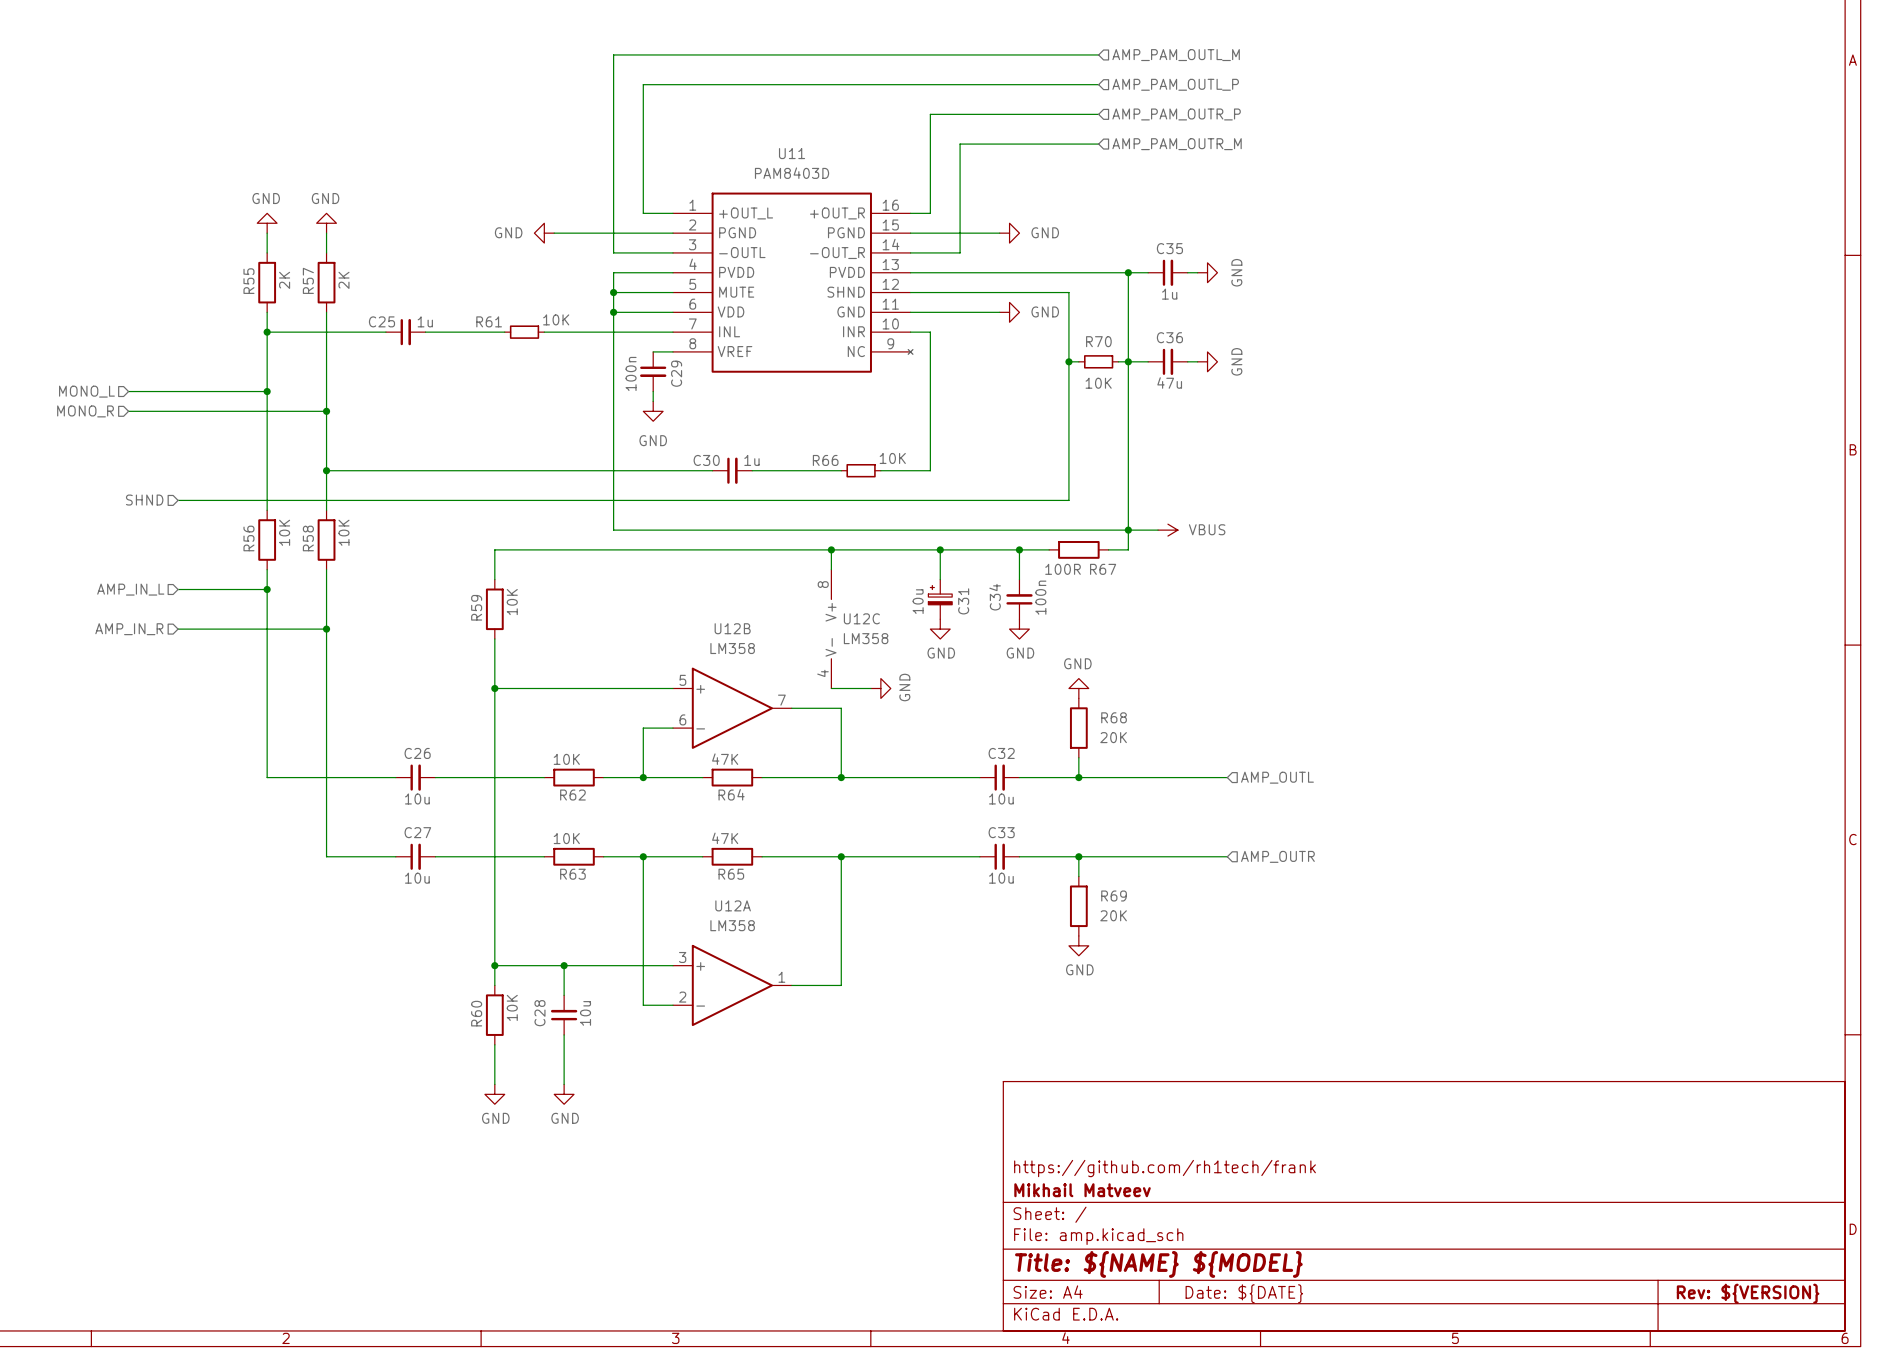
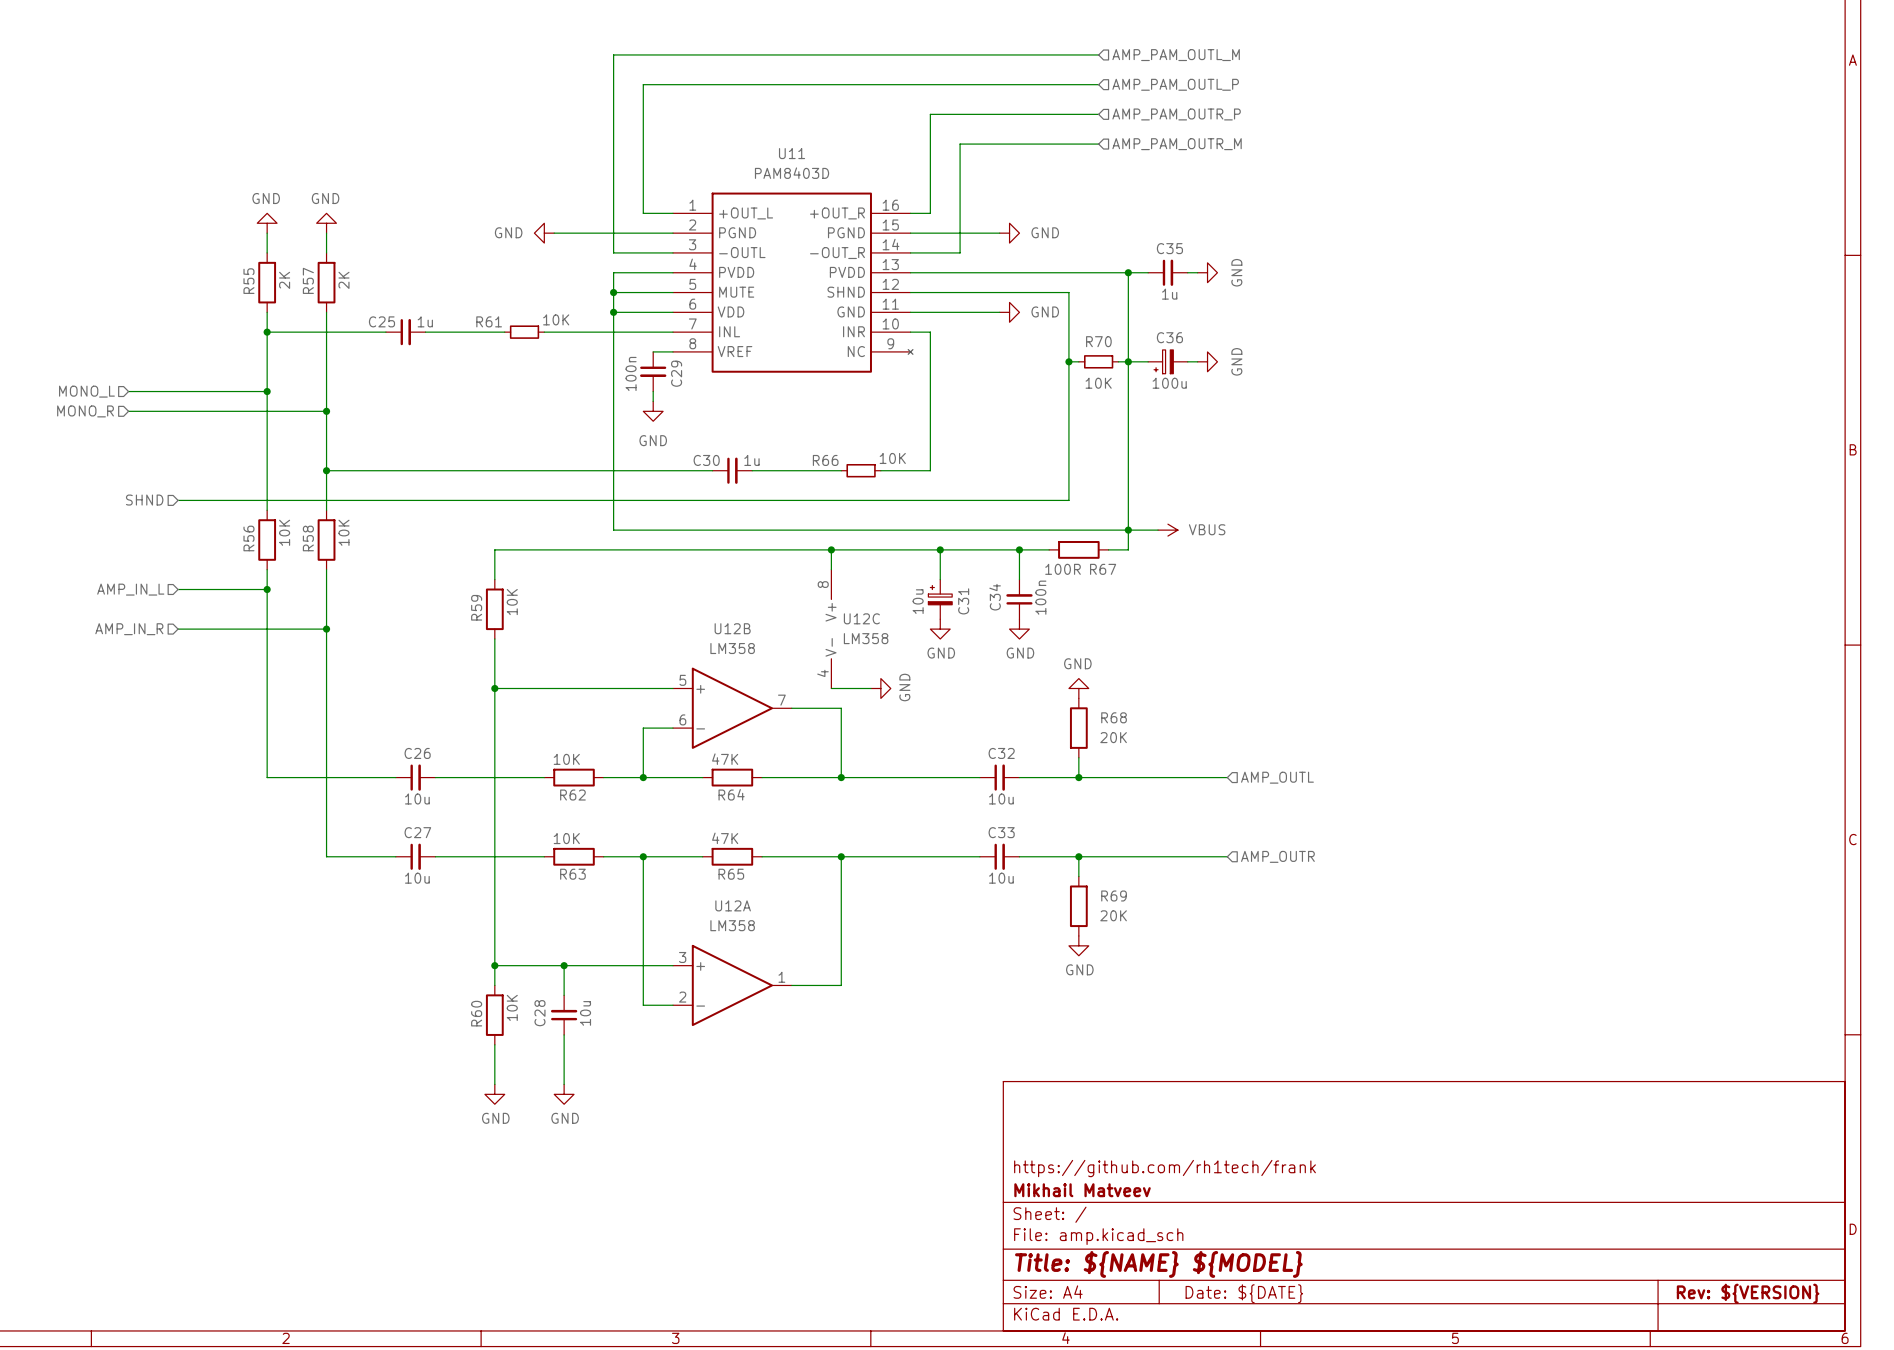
C36 symbol: [1148, 348, 1188, 376] -> [1148, 349, 1188, 374]
C36 value: 47u (1169, 383) -> 100u (1169, 383)

